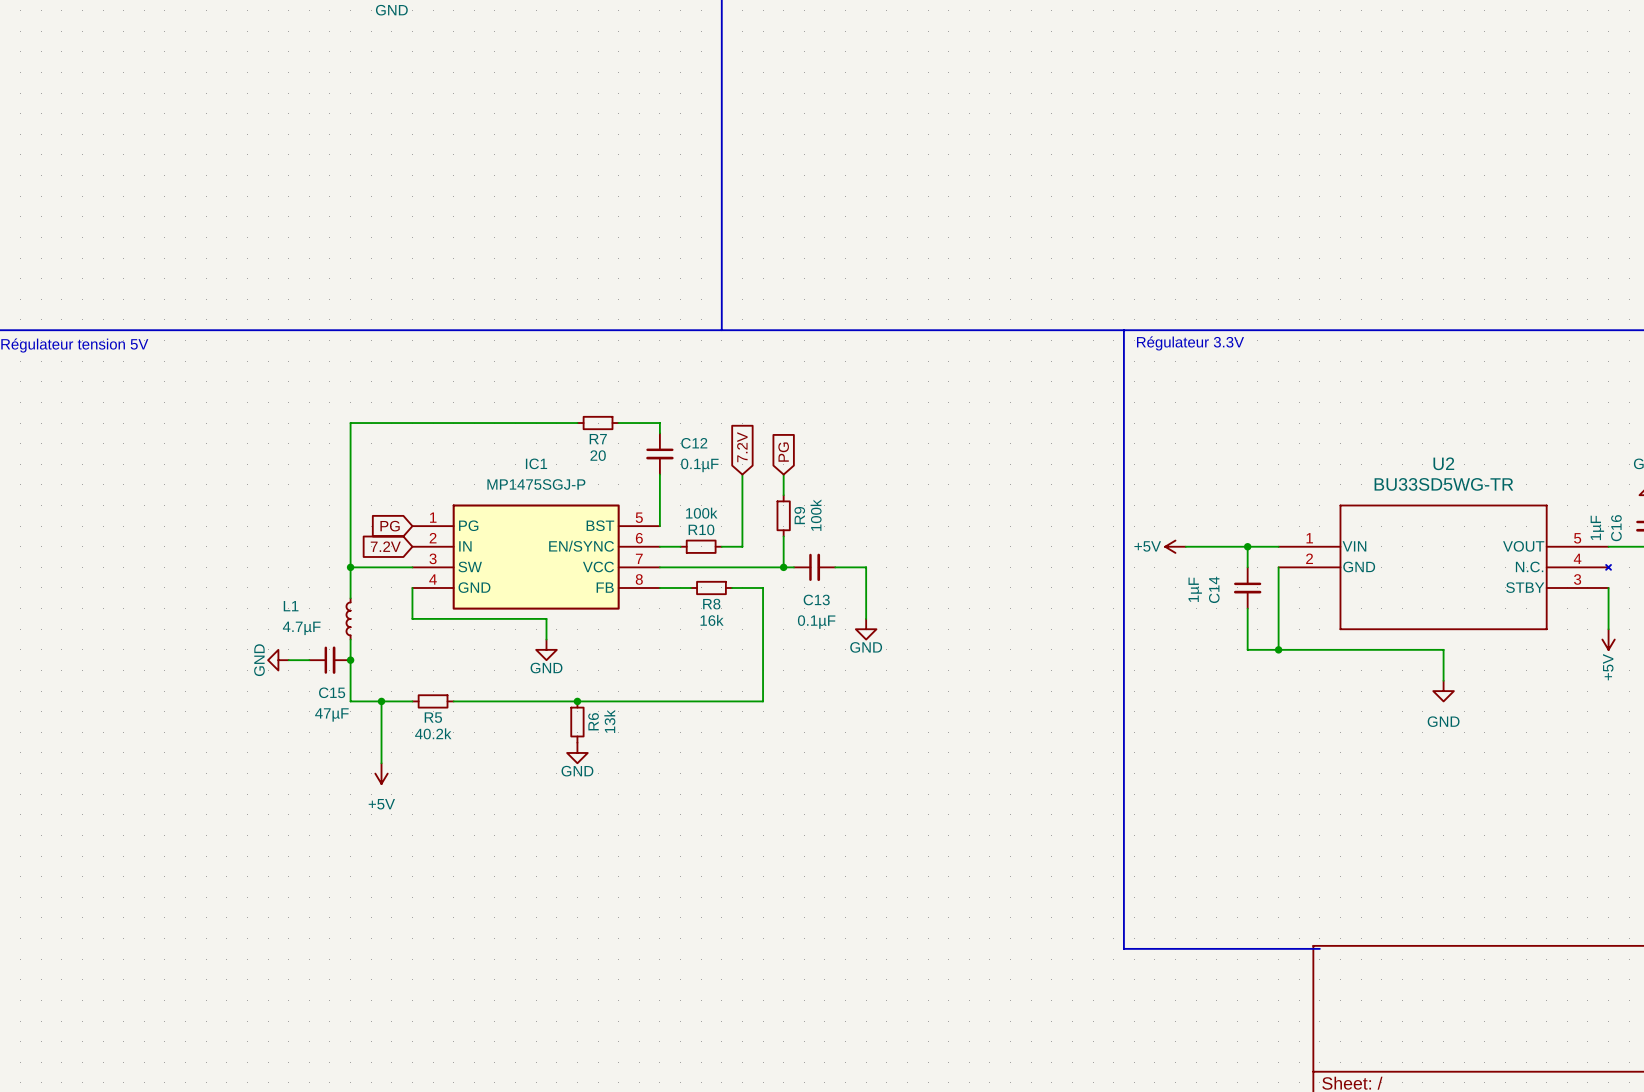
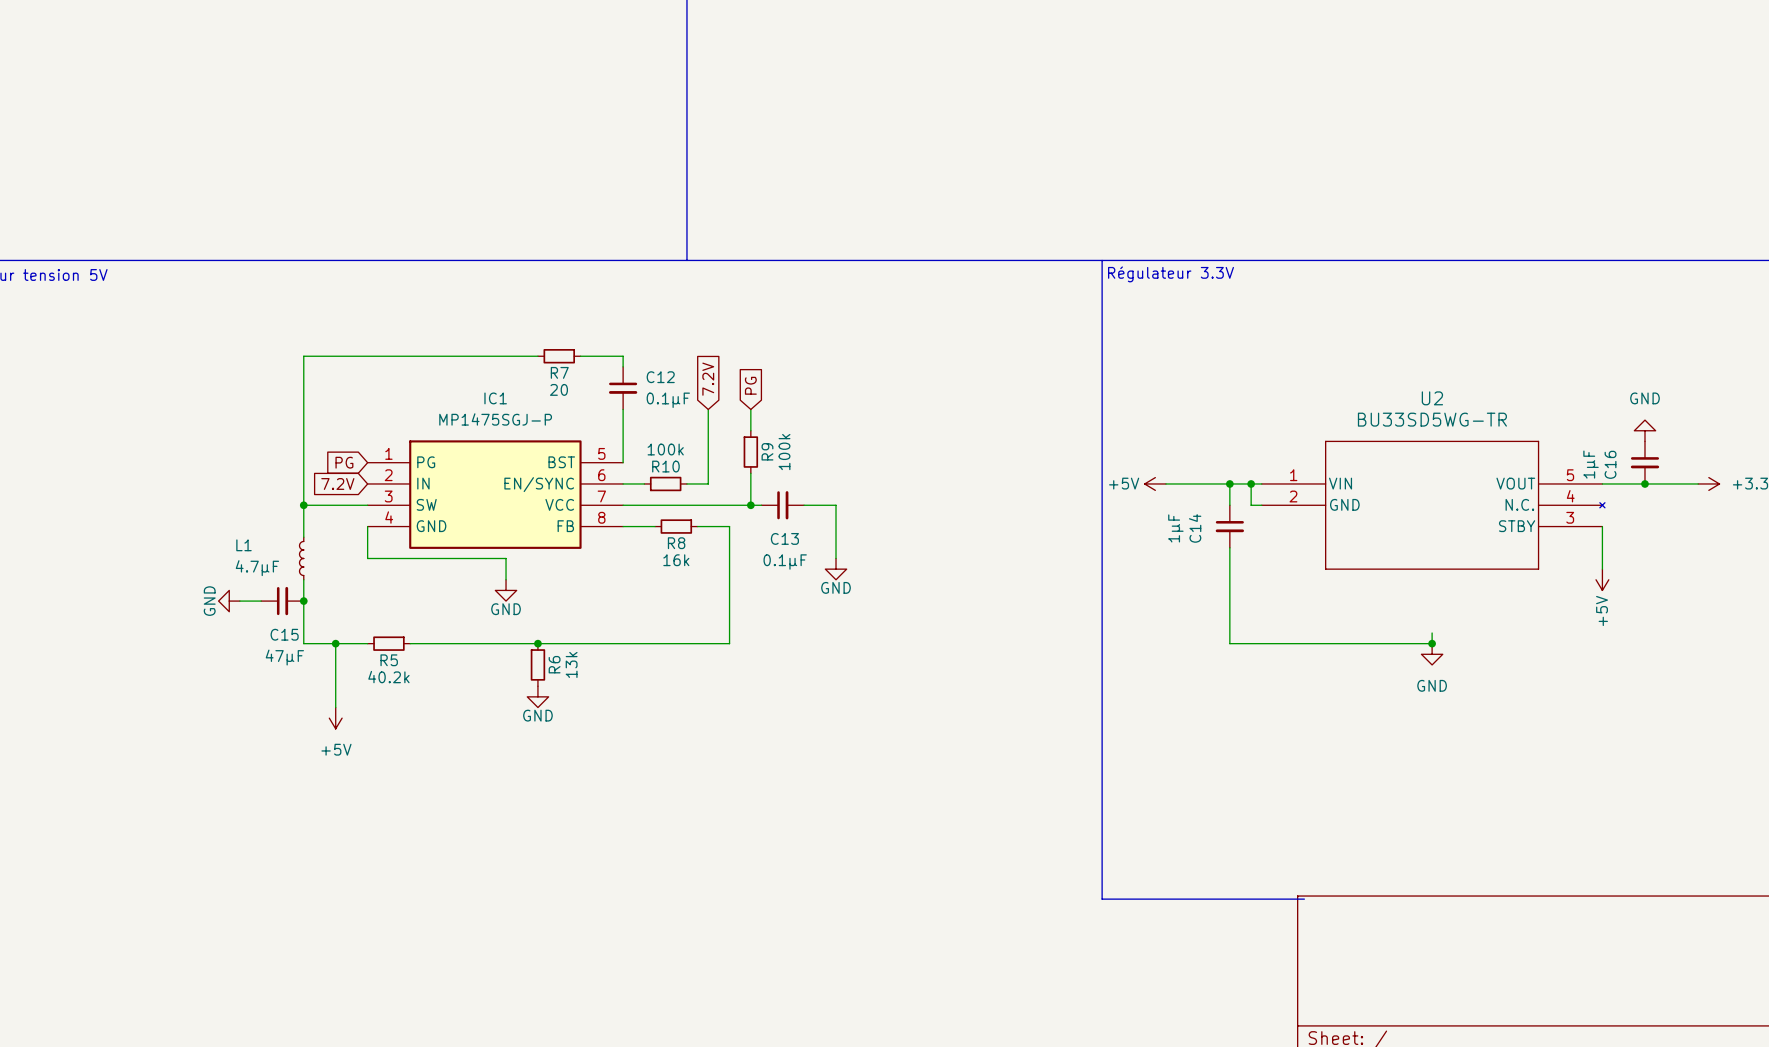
junction: none -> (1251, 483)
wire: (1278, 567) (1278, 649) -> (1261, 505) (1251, 505) (1251, 483)
wire: (1247, 649) (1443, 649) (1443, 680) -> (1229, 590) (1229, 643) (1432, 643) (1432, 633)
junction: (1278, 649) -> none
power symbol position: GND (1443, 691) -> GND (1432, 654)
junction: none -> (1432, 643)

